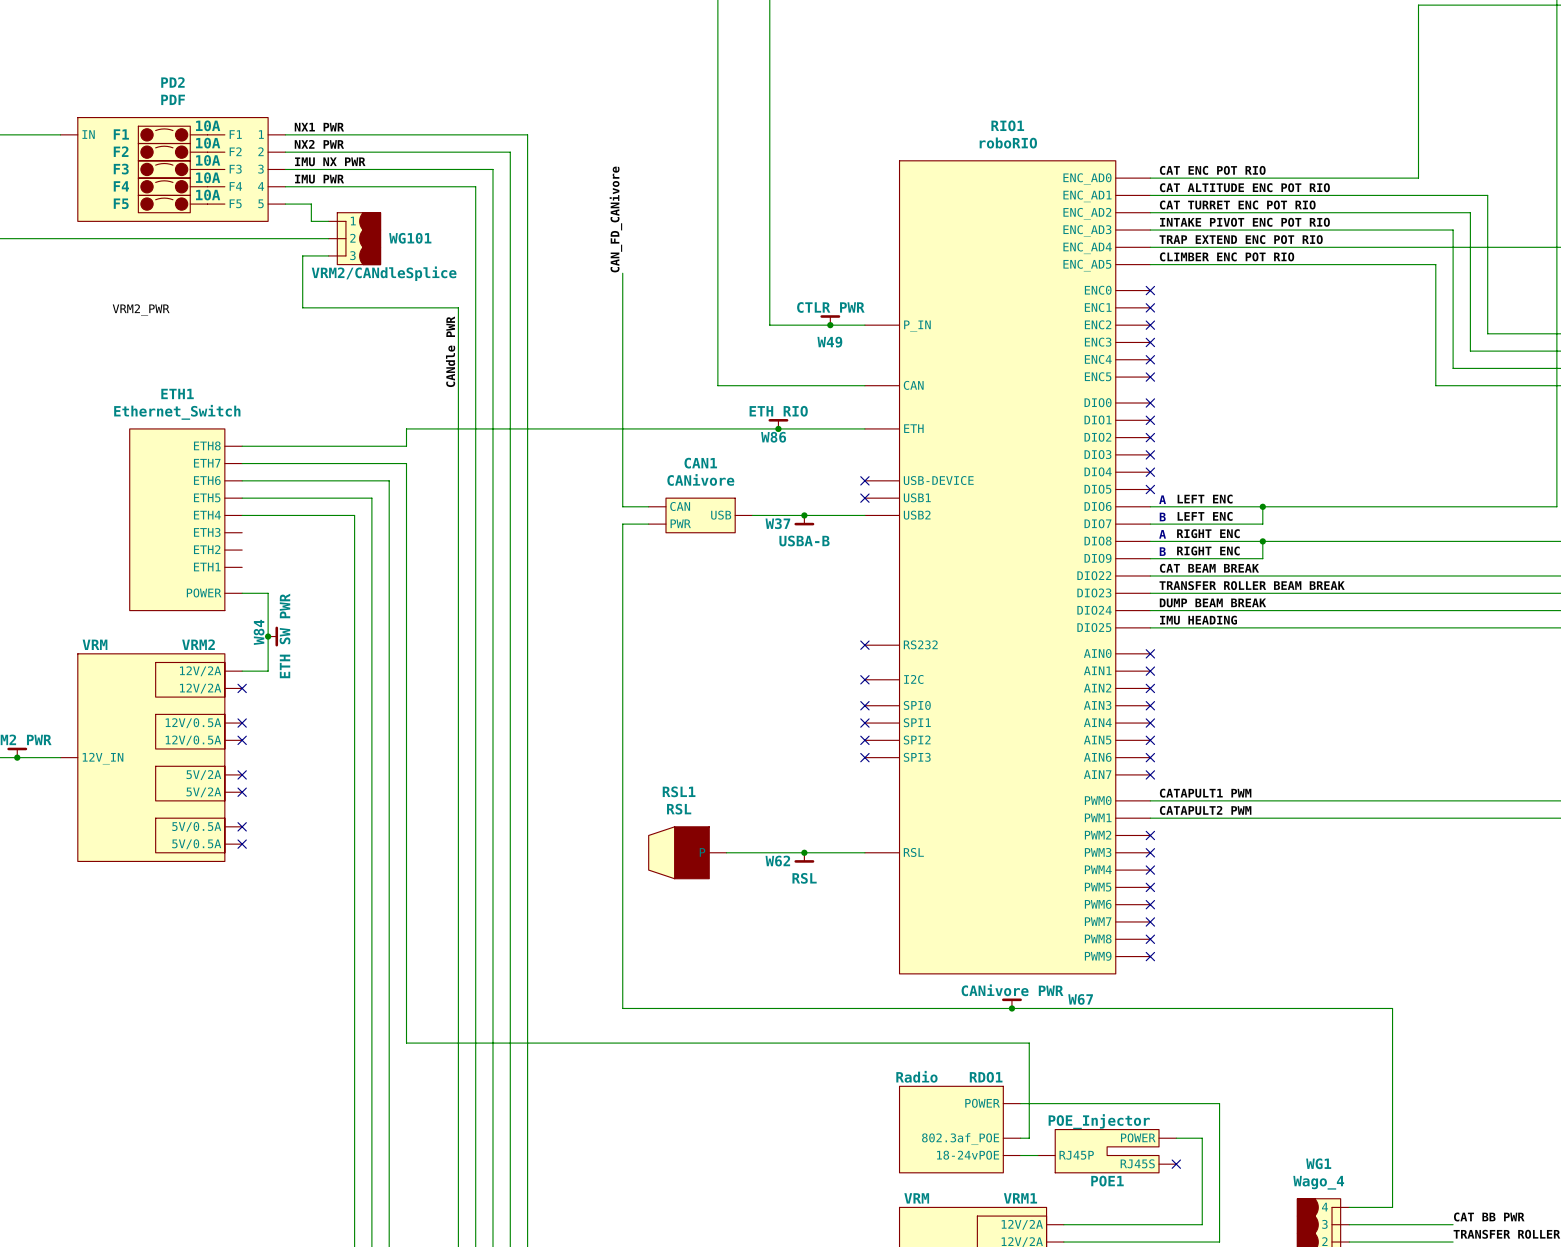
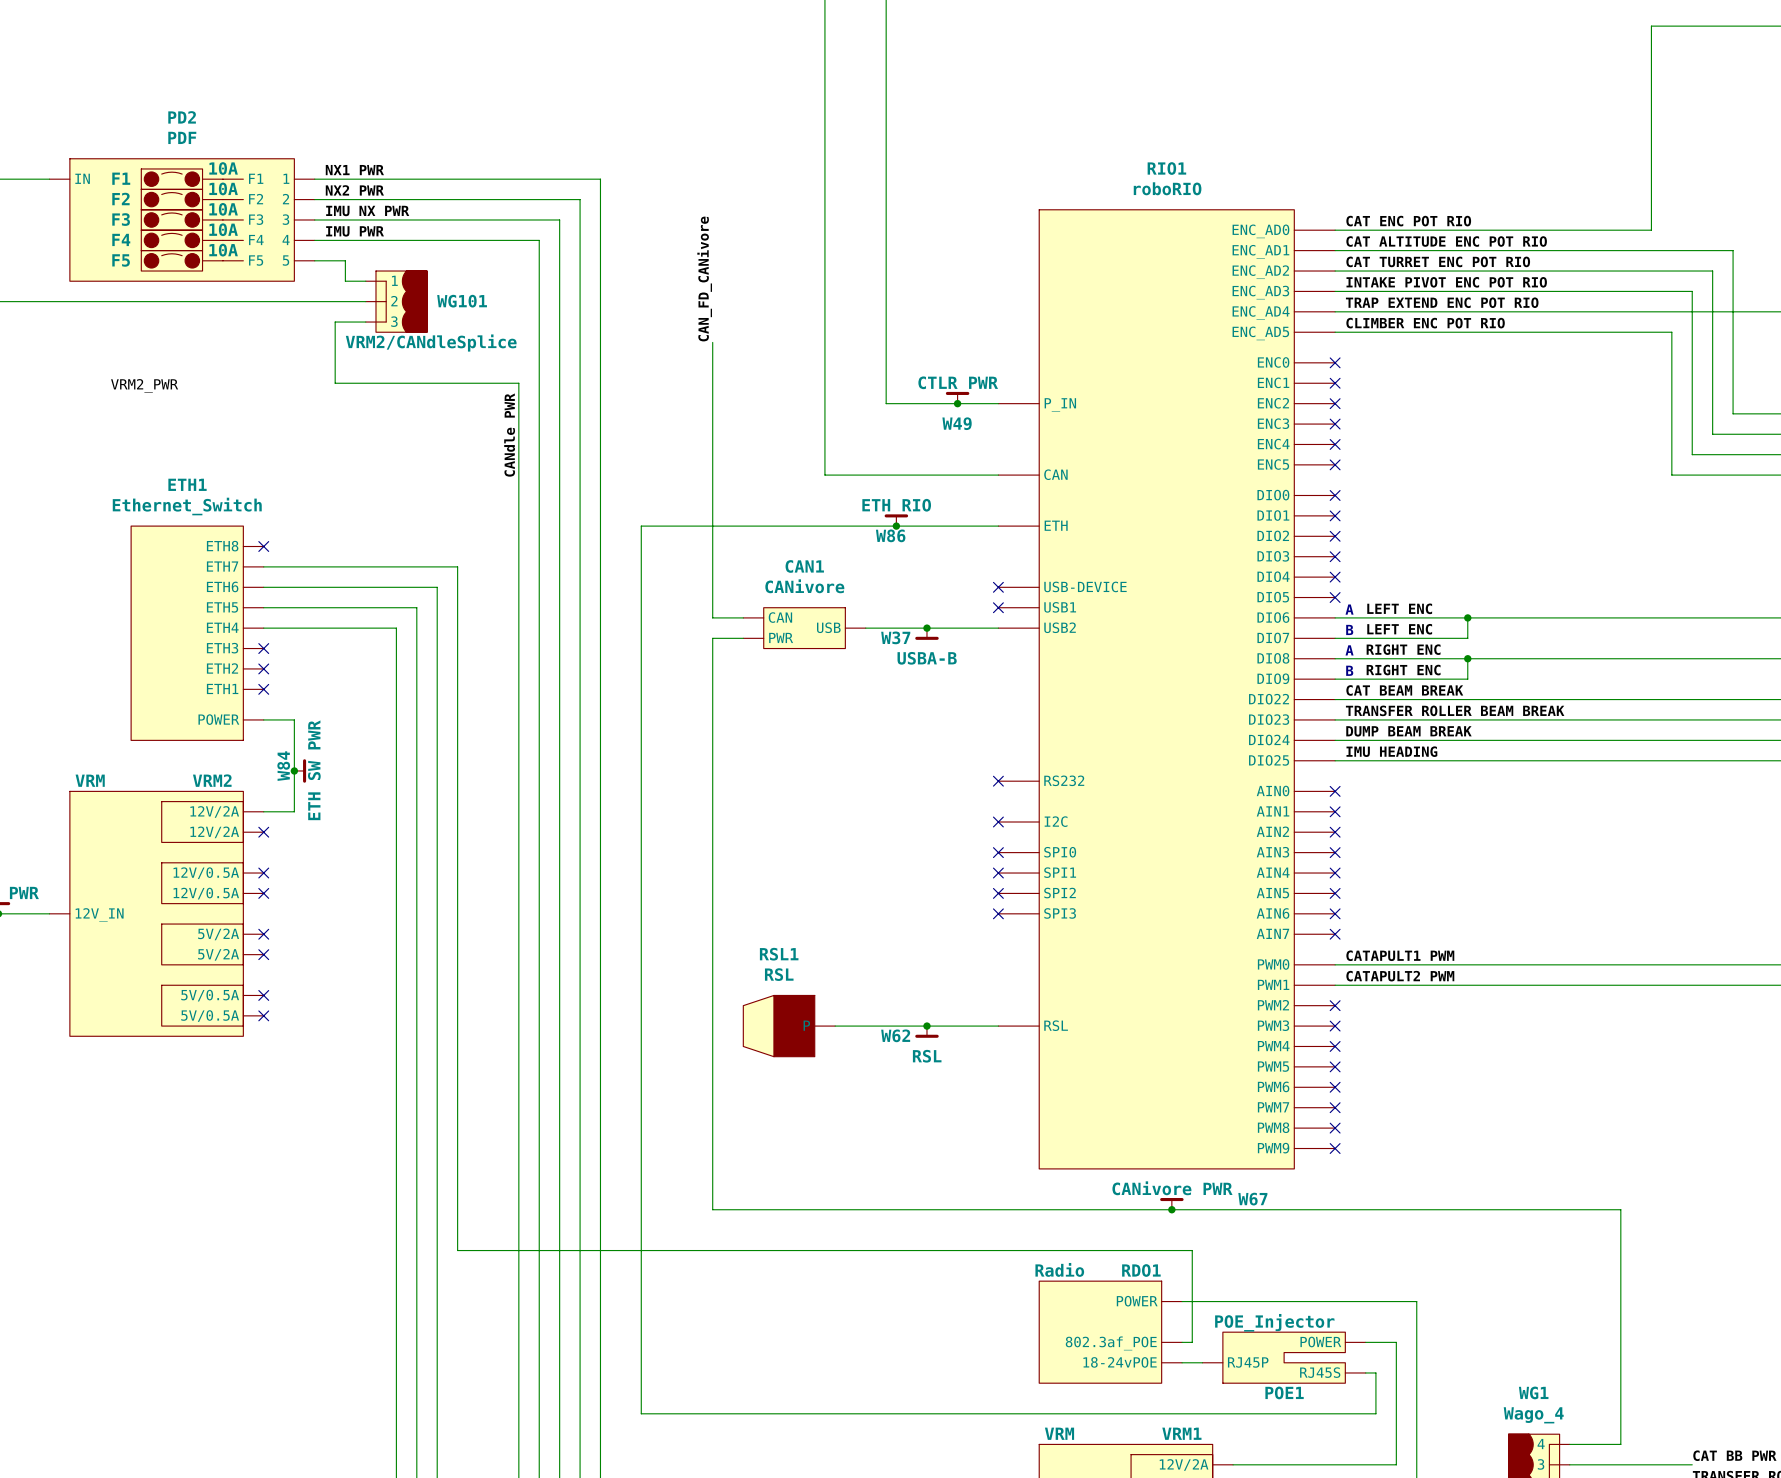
wire: (562, 428) (406, 428) (406, 446) (242, 446) -> (641, 526) (641, 1413) (1375, 1413) (1375, 1372) (1365, 1372)
no-connect mark: none -> (263, 546)
no-connect mark: none -> (263, 648)
no-connect mark: none -> (263, 668)
no-connect mark: none -> (263, 689)
wire: (1020, 1103) (1219, 1103) -> (1182, 1301) (1416, 1301) (1416, 1321)
wire: (1029, 1120) (1029, 1138) -> (1192, 1342) (1182, 1342)
RDO1 position: (960, 1129) -> (1110, 1332)
wire: none -> (1192, 1362) (1202, 1362)
wire: (1176, 1138) (1202, 1138) -> (1365, 1342) (1396, 1342) (1396, 1362)
POE1 position: (1107, 1151) -> (1284, 1357)
wire: (1020, 1155) (1037, 1155) -> none
no-connect mark: (1176, 1164) -> none

